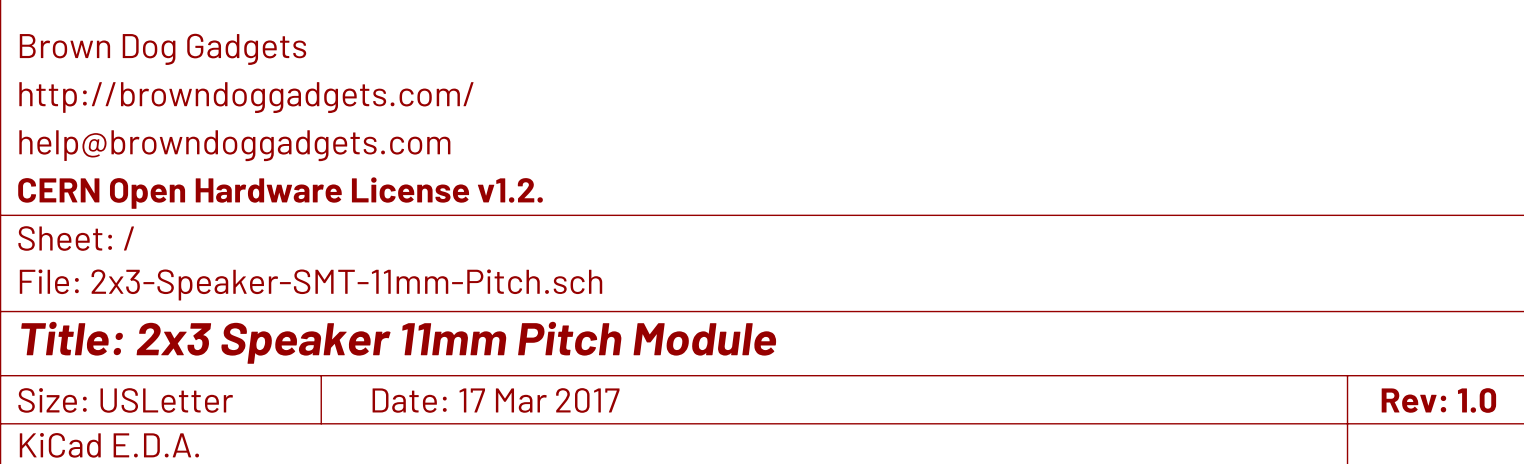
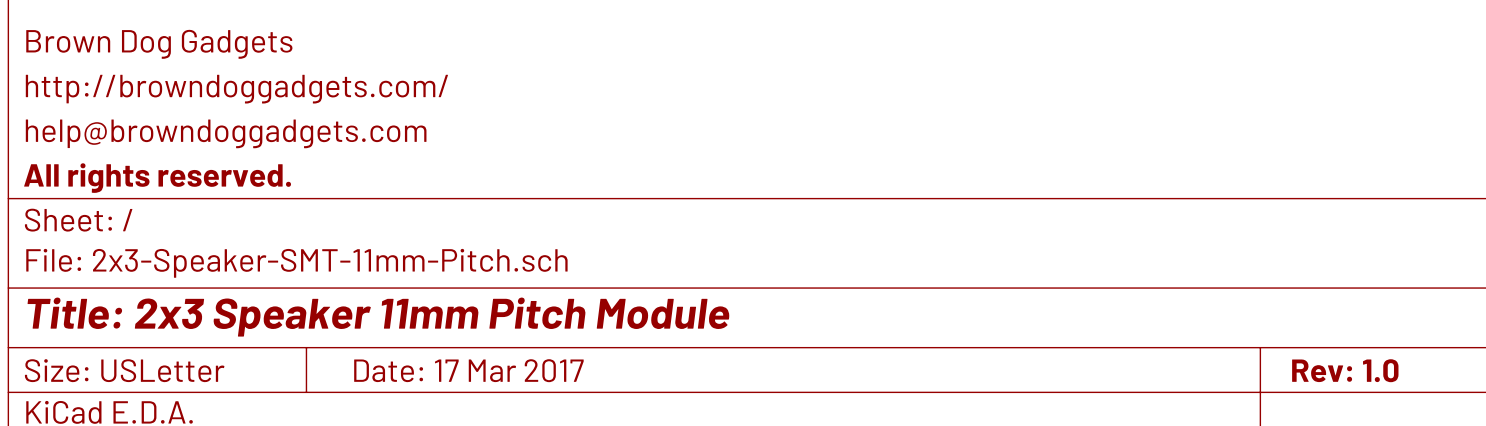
title block: CERN Open Hardware License v1.2. (280, 193) -> All rights reserved. (157, 178)

